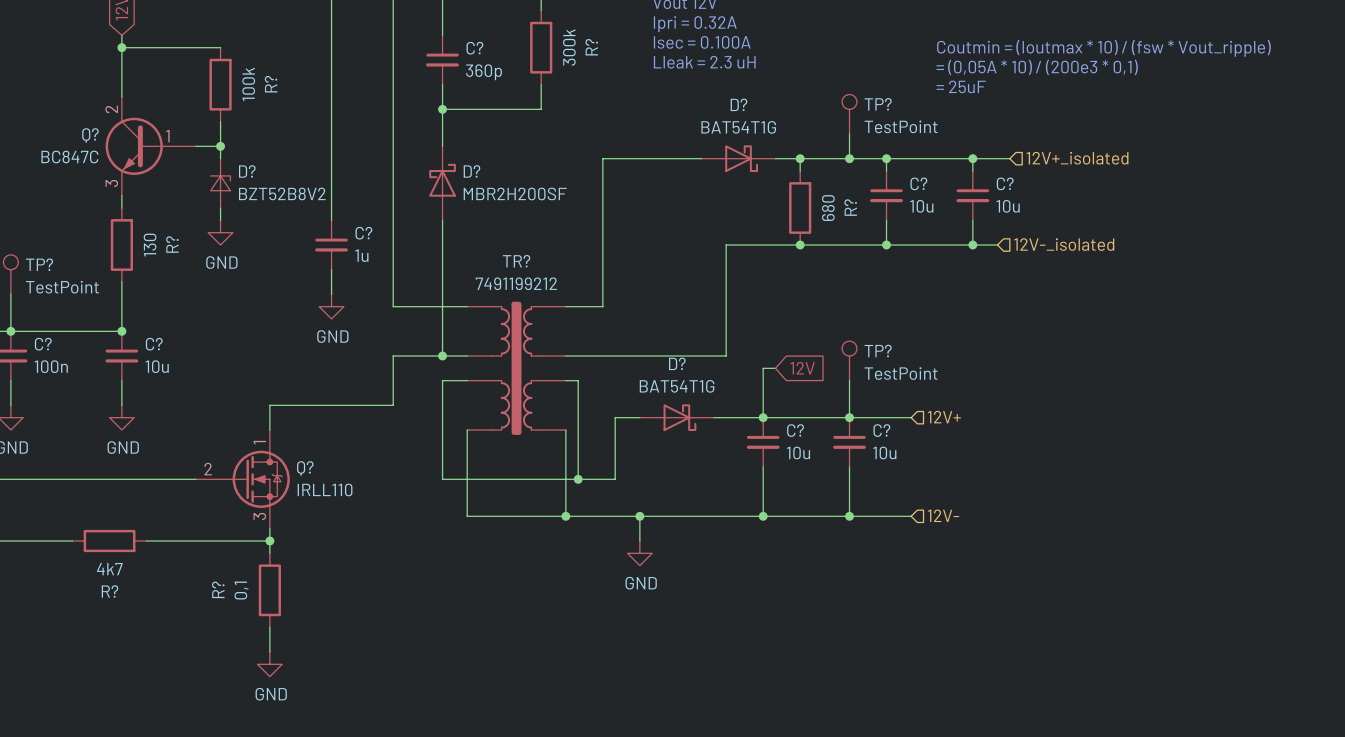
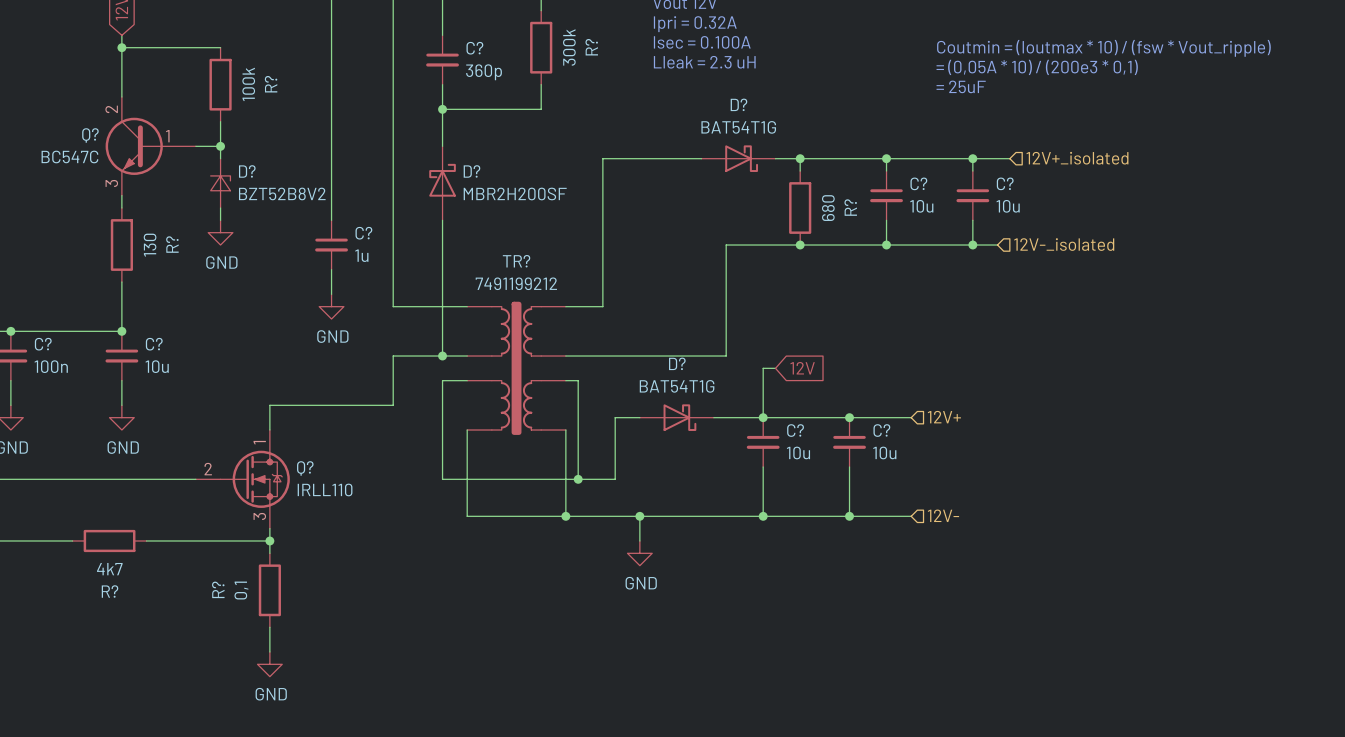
TP?: TestPoint (849, 114) -> none
wire: (849, 134) (849, 158) -> none
Q? value: BC847C (69, 156) -> BC547C (69, 156)
junction: (849, 158) -> none
TP?: TestPoint (10, 274) -> none
wire: (10, 294) (10, 331) -> none
TP?: TestPoint (849, 360) -> none
wire: (849, 380) (849, 417) -> none

